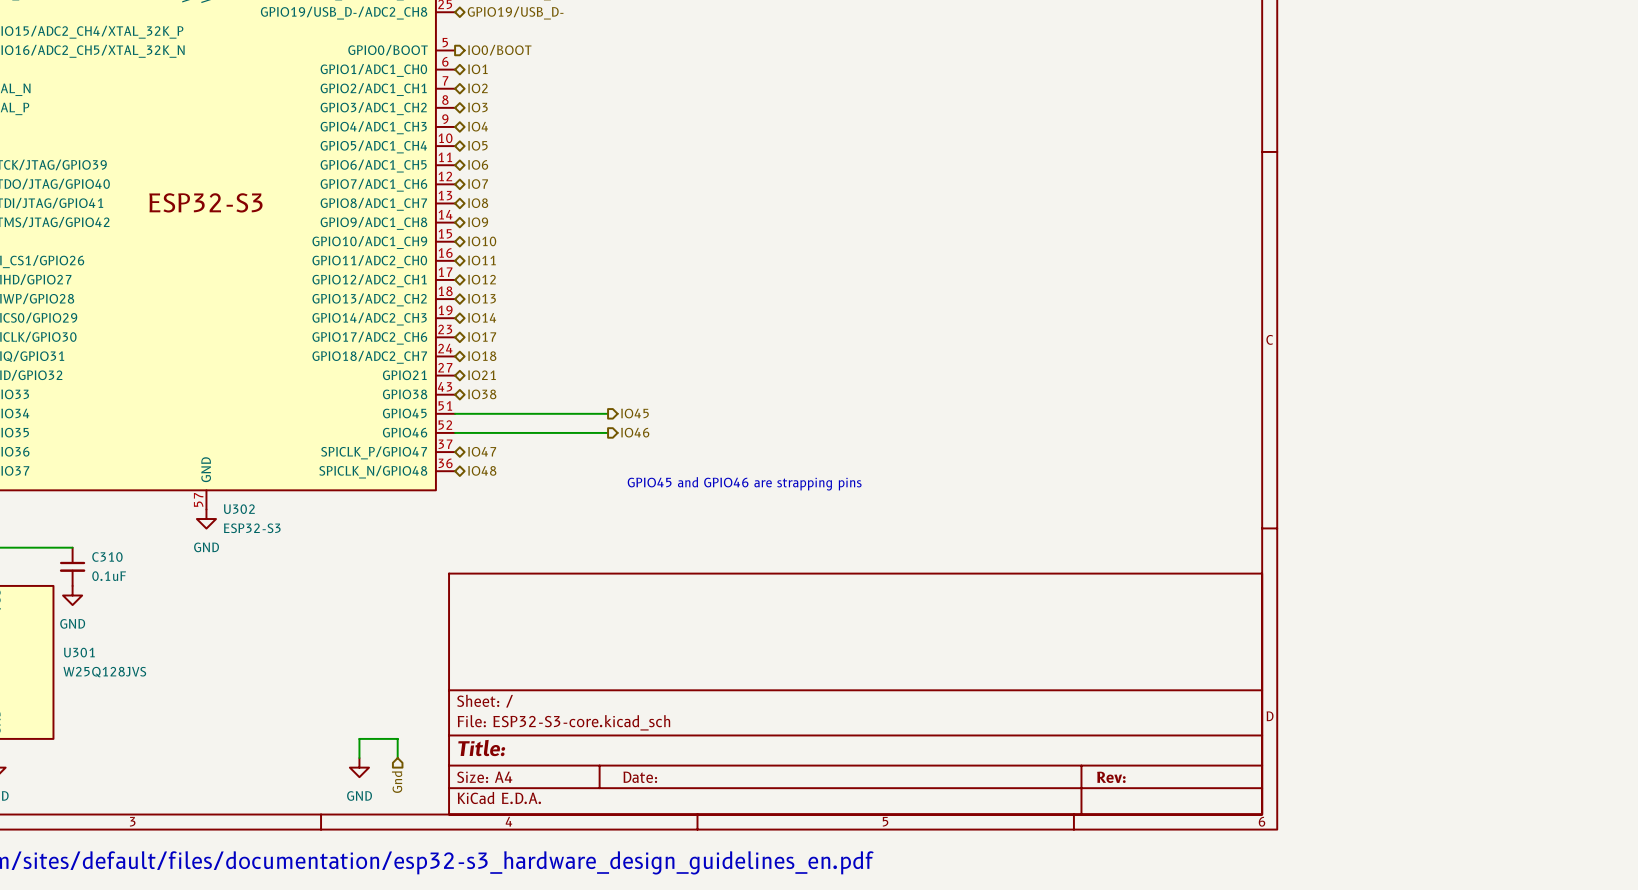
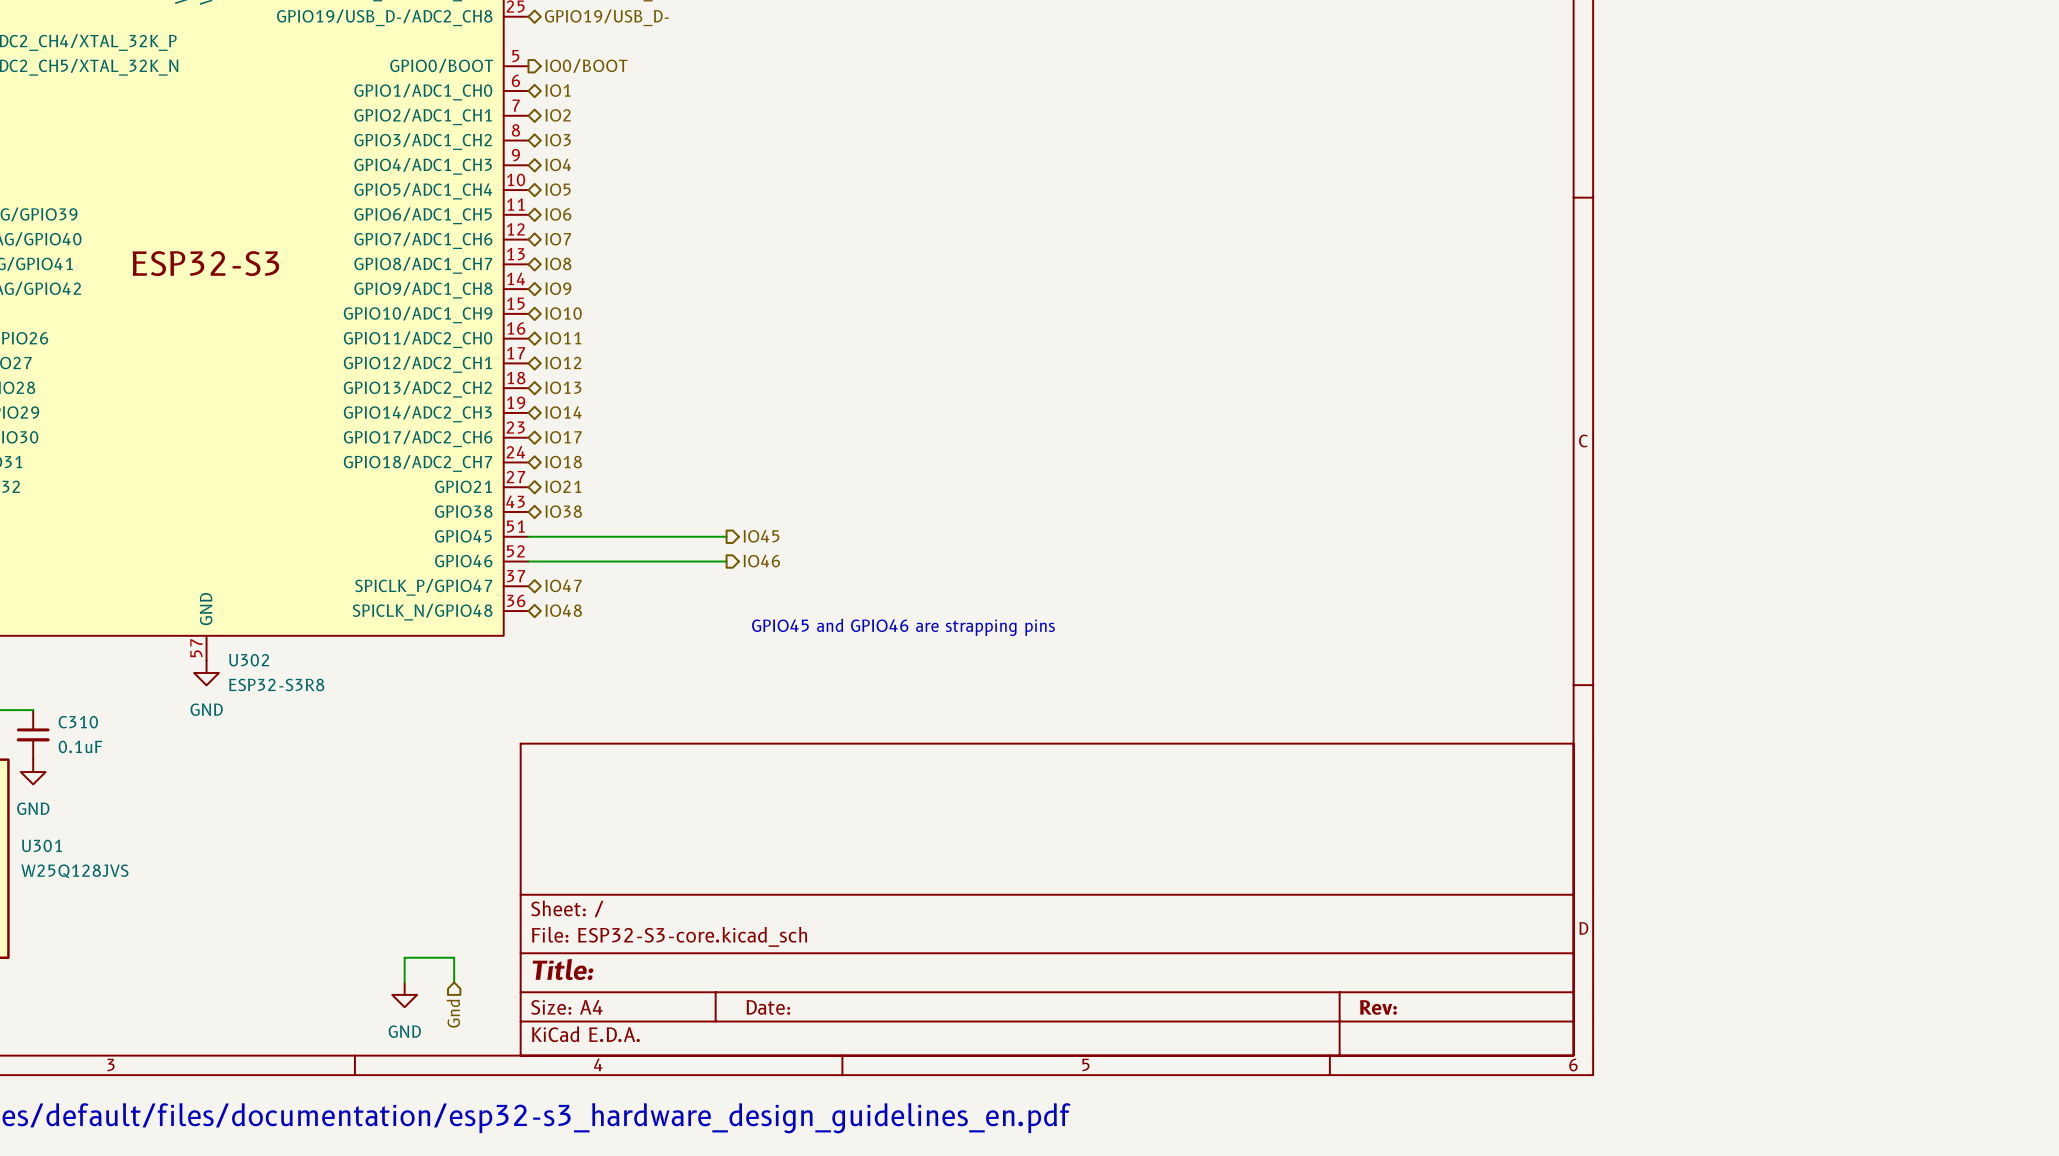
U302 value: ESP32-S3 (252, 528) -> ESP32-S3R8 (276, 684)

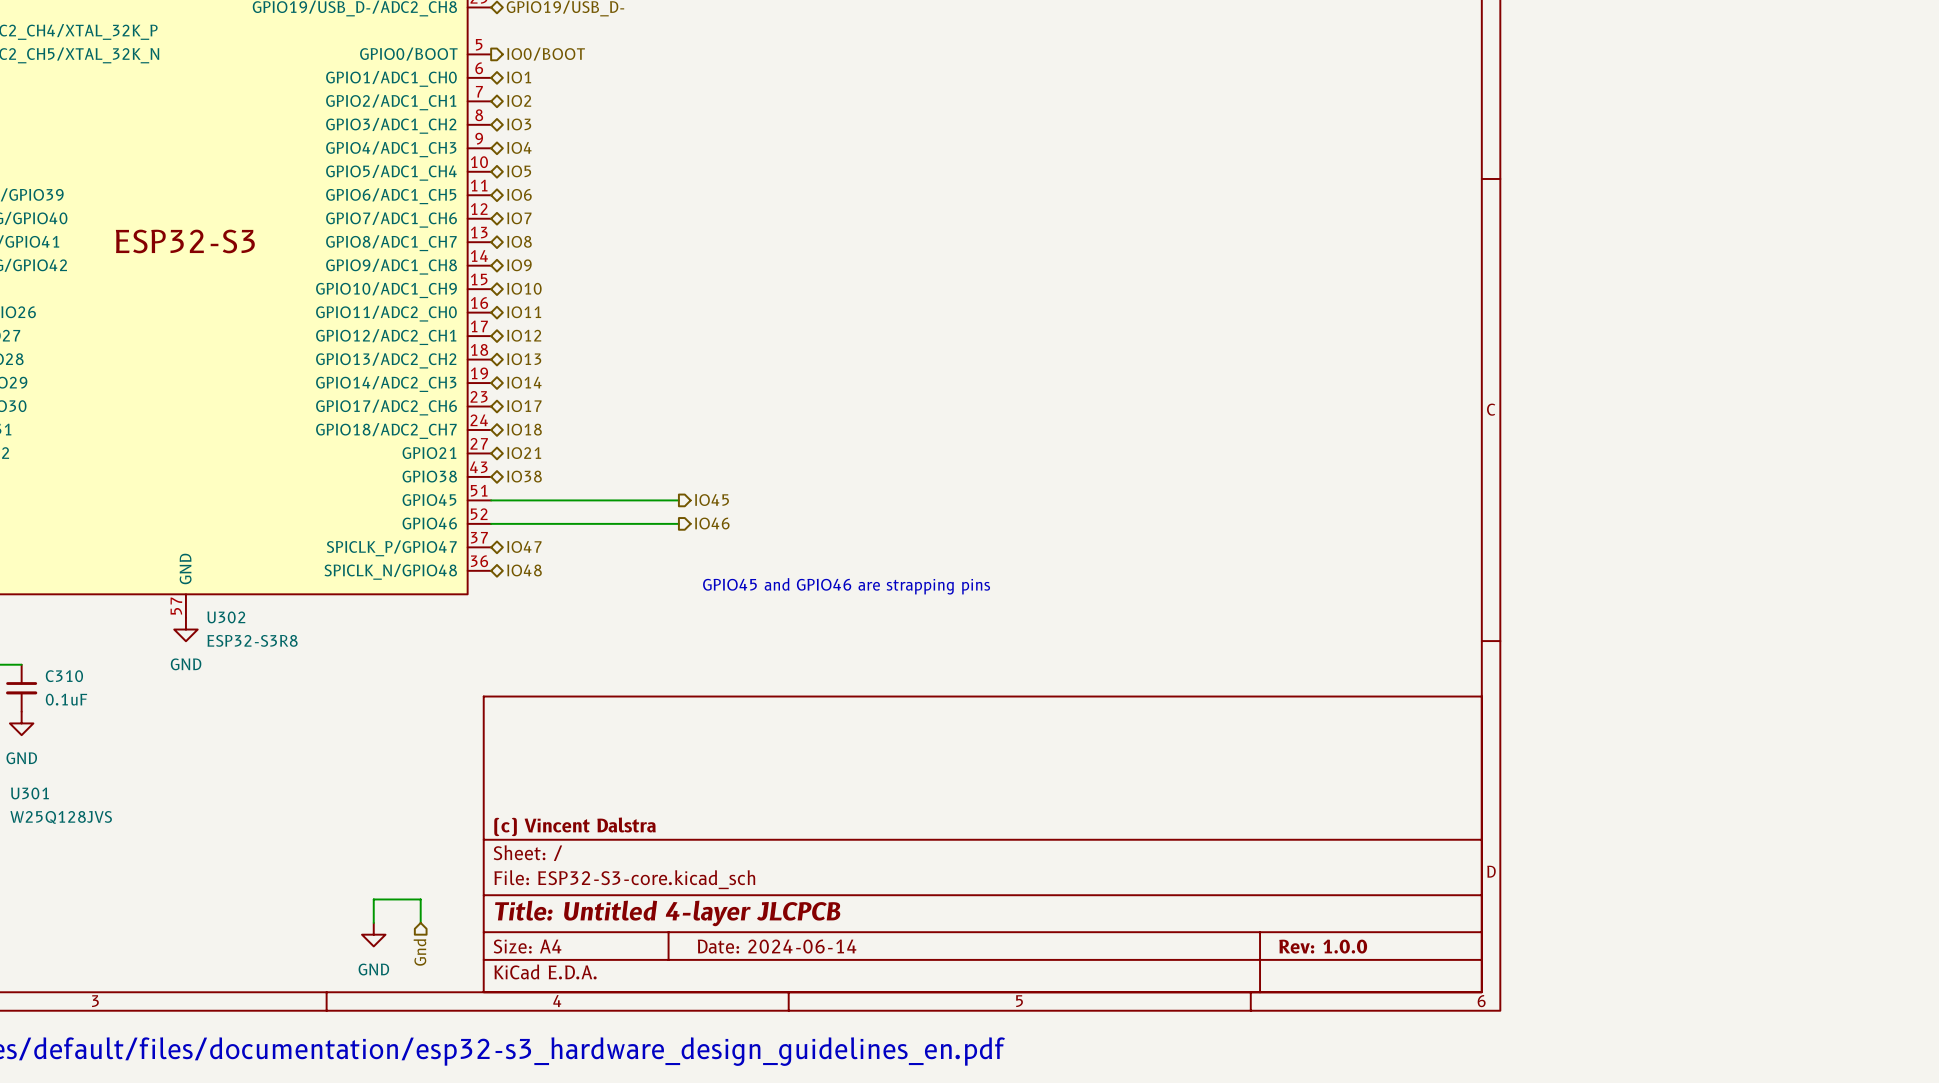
title block: none -> (c) Vincent Dalstra (574, 826)
title block: Title: (563, 969) -> Title: Untitled 4-layer JLCPCB (667, 913)
title block: Date: (768, 1007) -> Date: 2024-06-14 (777, 946)
title block: Rev: (1378, 1007) -> Rev: 1.0.0 (1323, 946)

